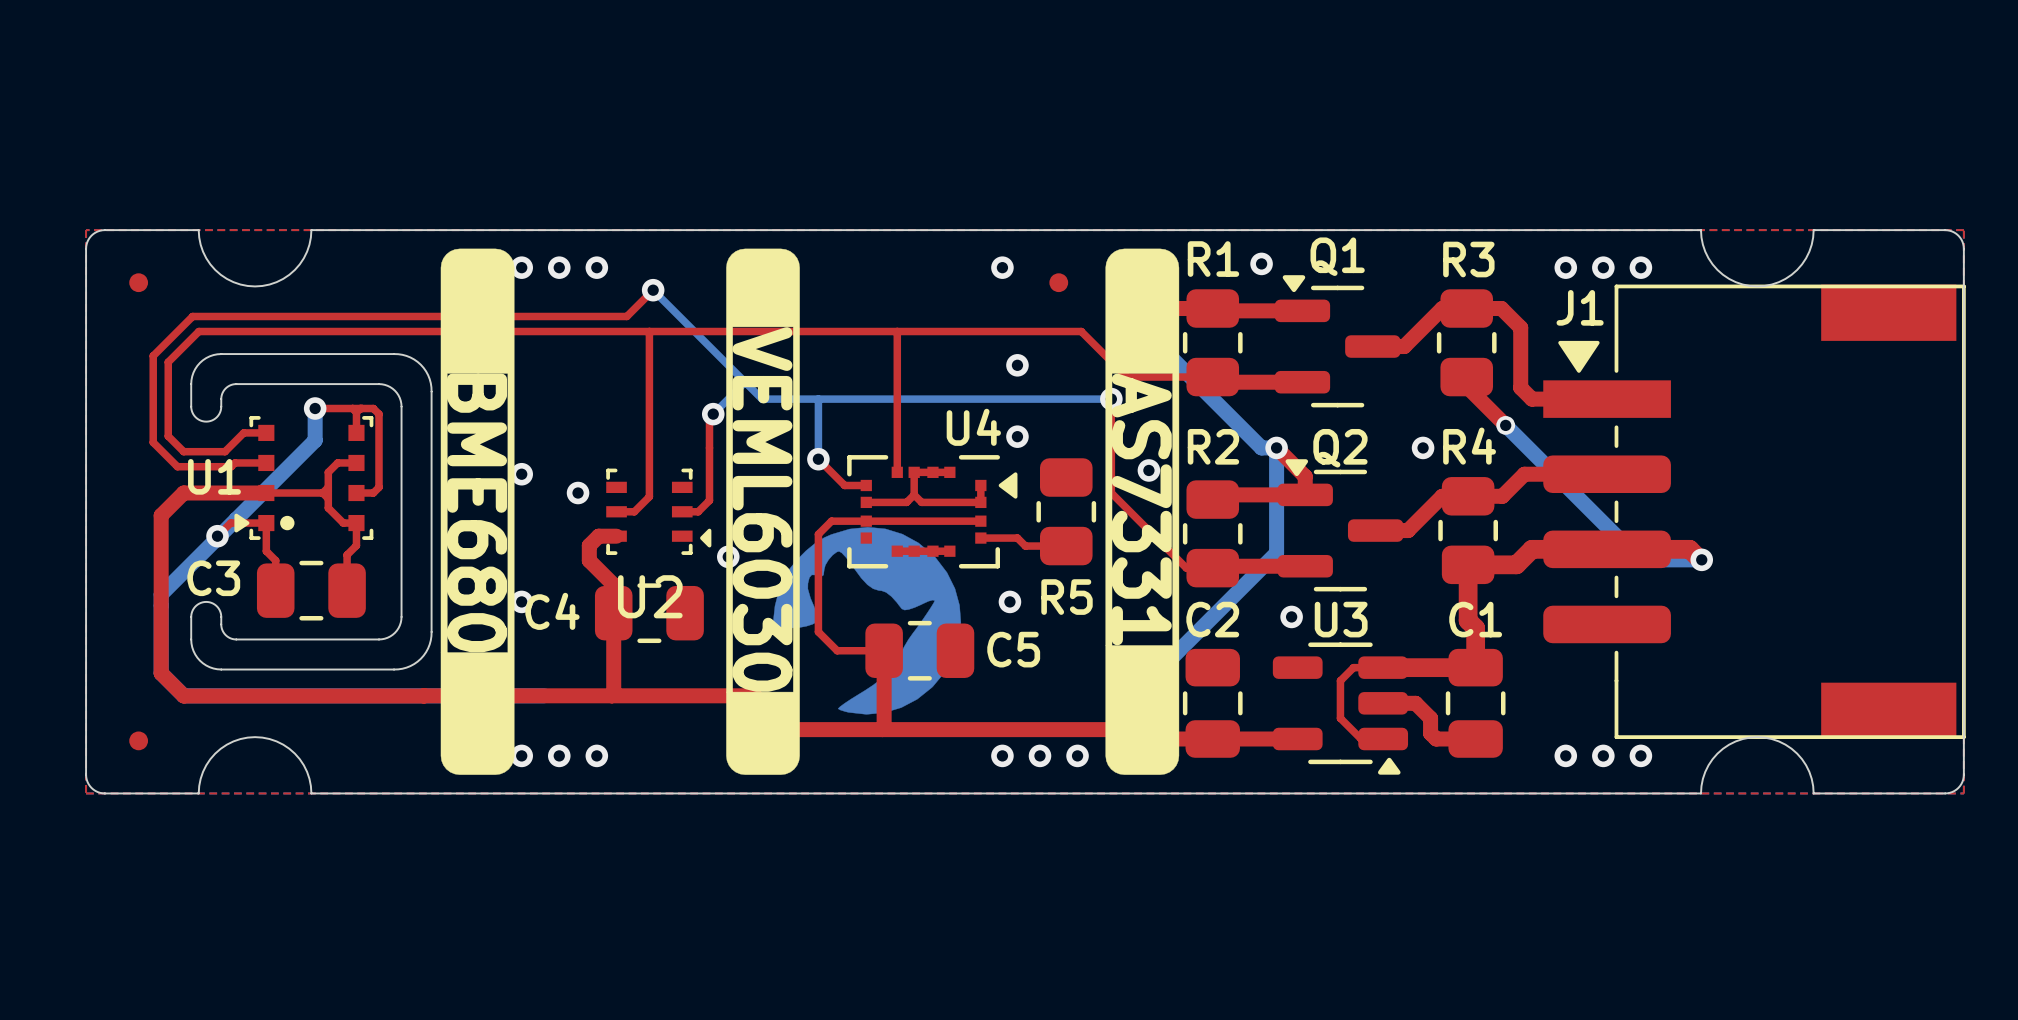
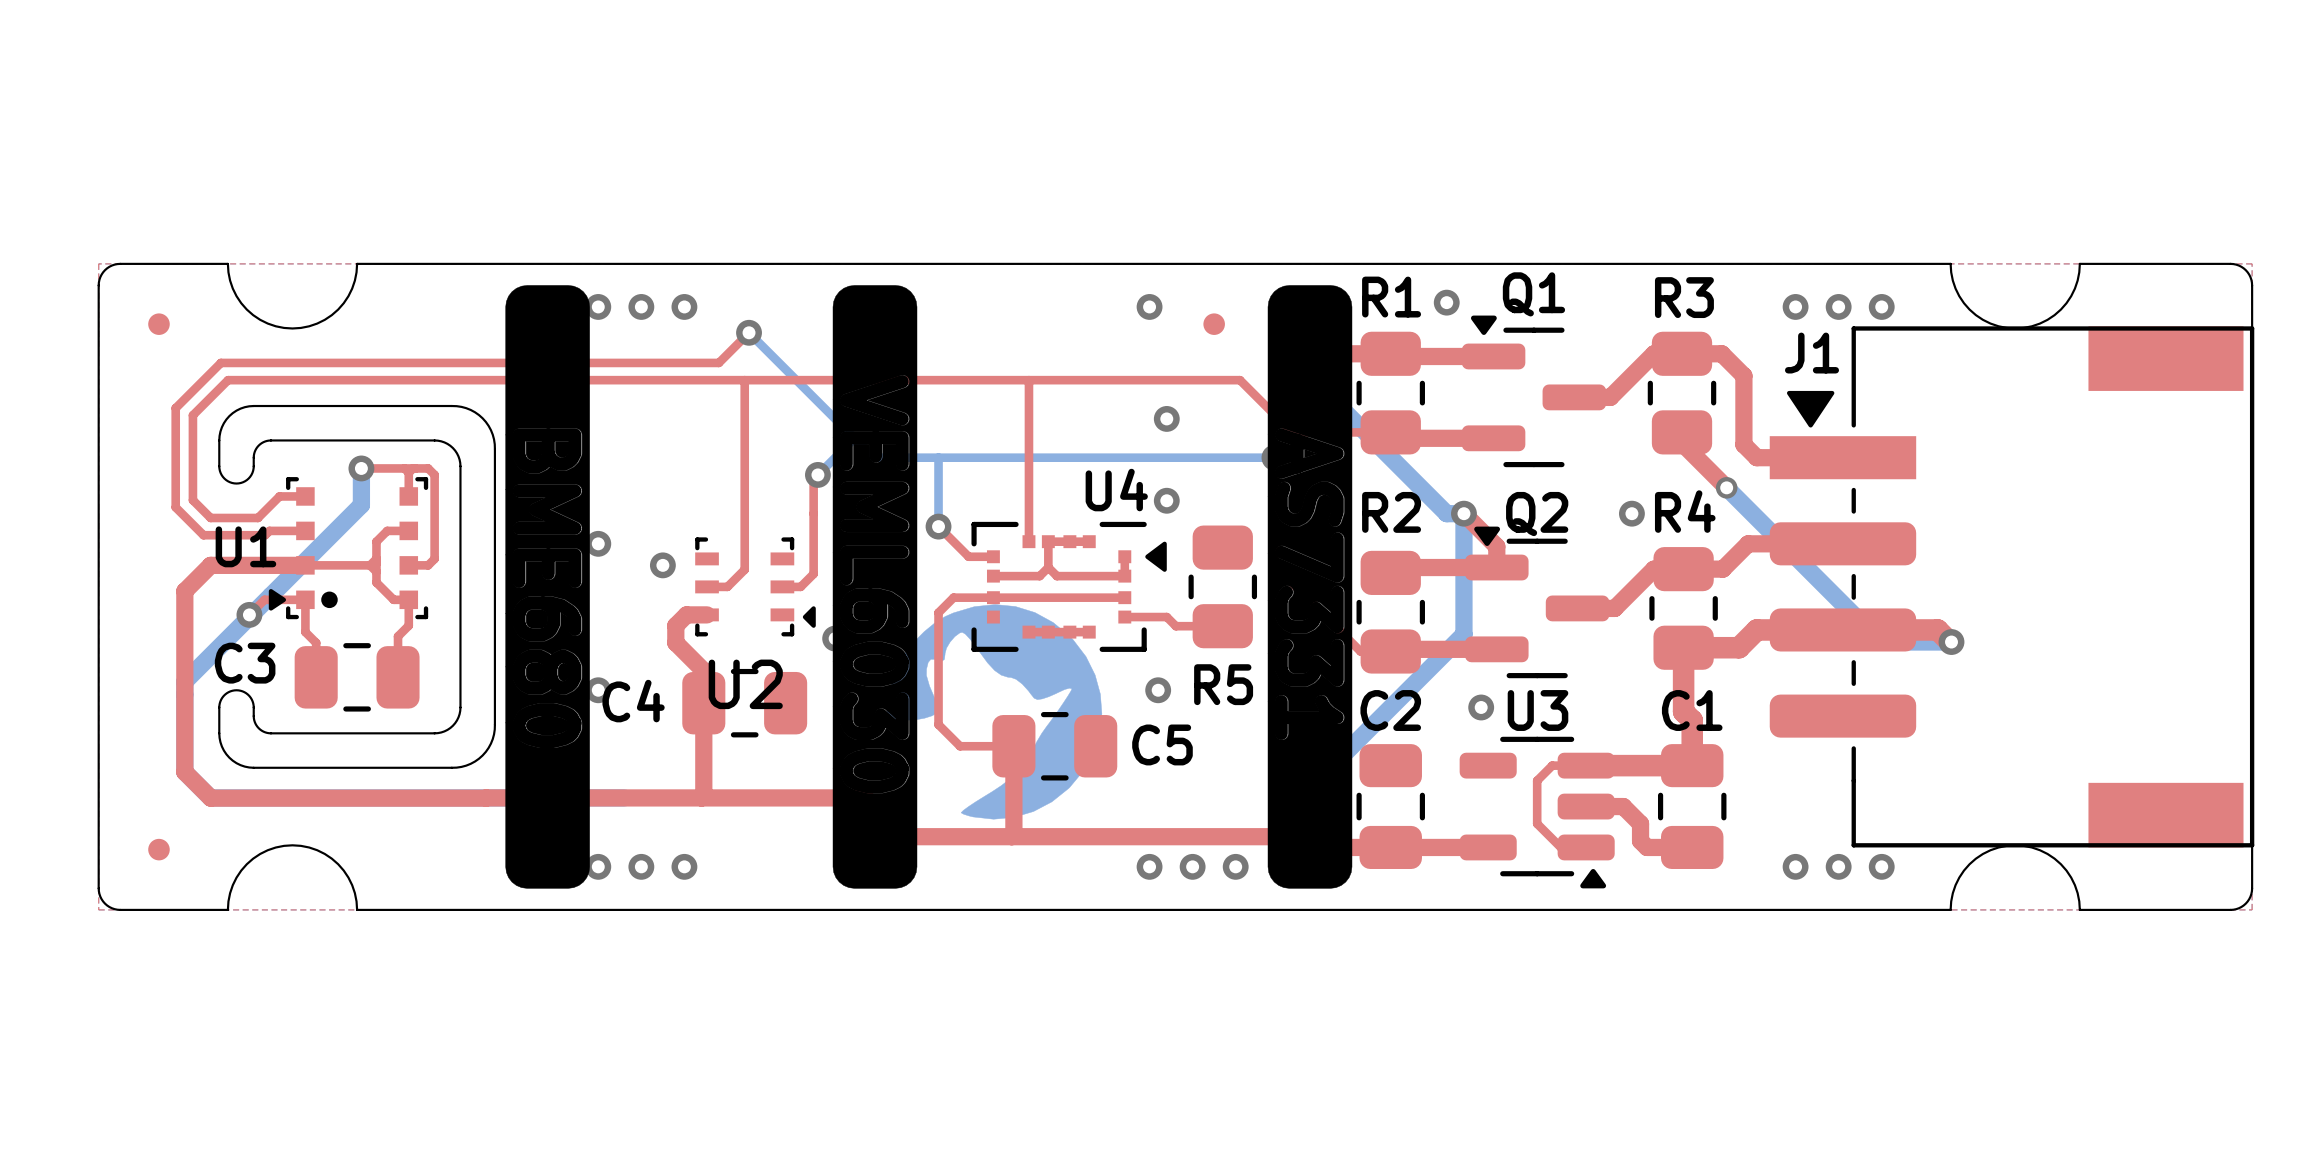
drawing shape: [440, 248, 515, 775] -> [505, 285, 590, 889]
drawing shape: [726, 248, 800, 775] -> [832, 285, 918, 889]
drawing shape: [1105, 248, 1180, 775] -> [1267, 285, 1353, 889]
drawing: none -> [525, 441, 570, 461]
drawing: none -> [1304, 449, 1318, 459]
drawing: none -> [853, 601, 897, 674]
drawing: none -> [525, 609, 570, 736]
drawing: none -> [853, 761, 897, 781]

